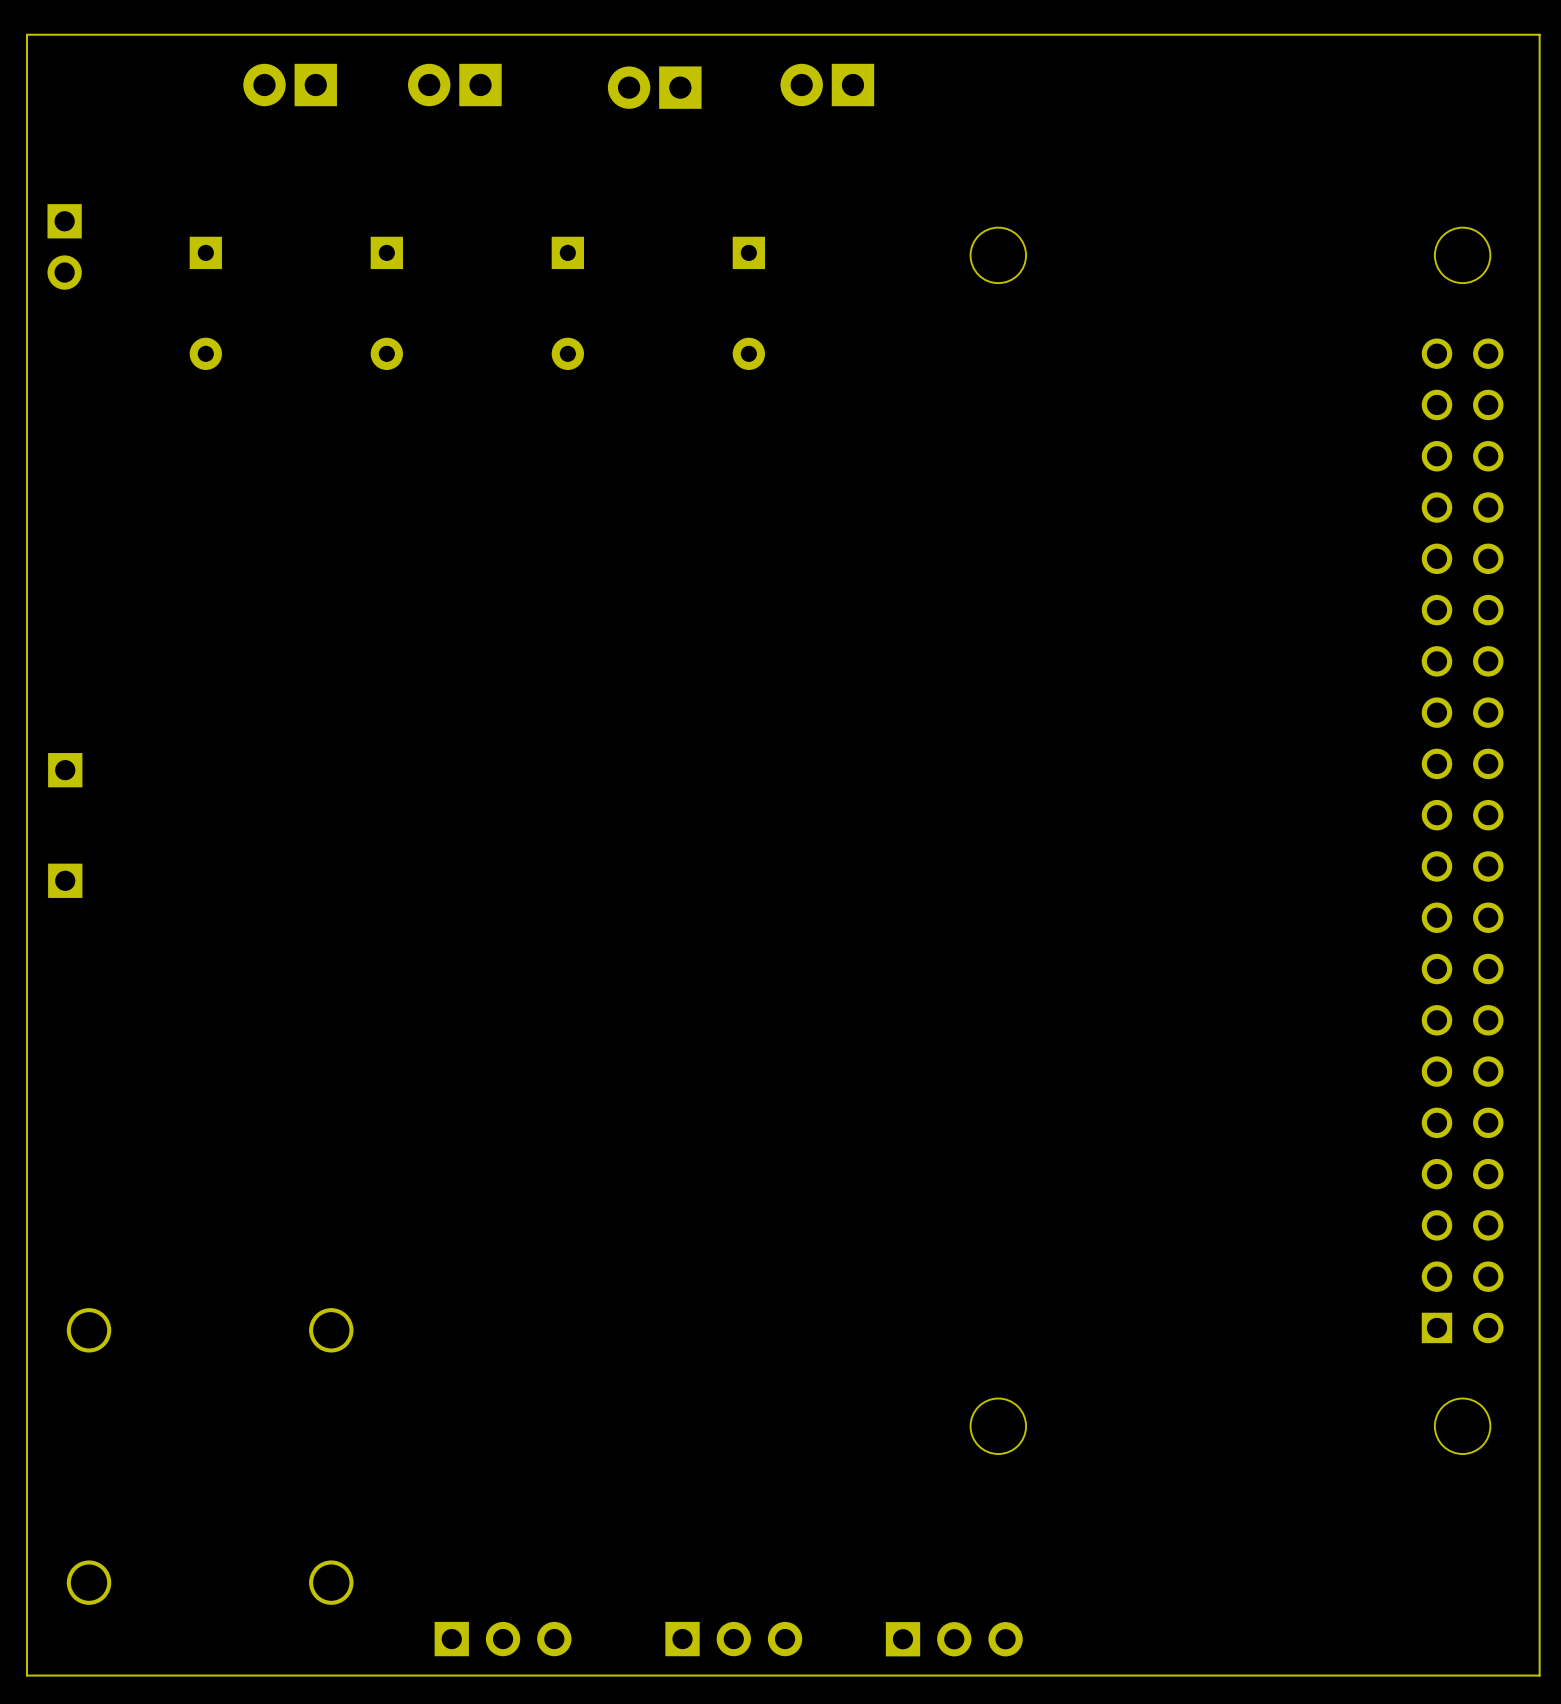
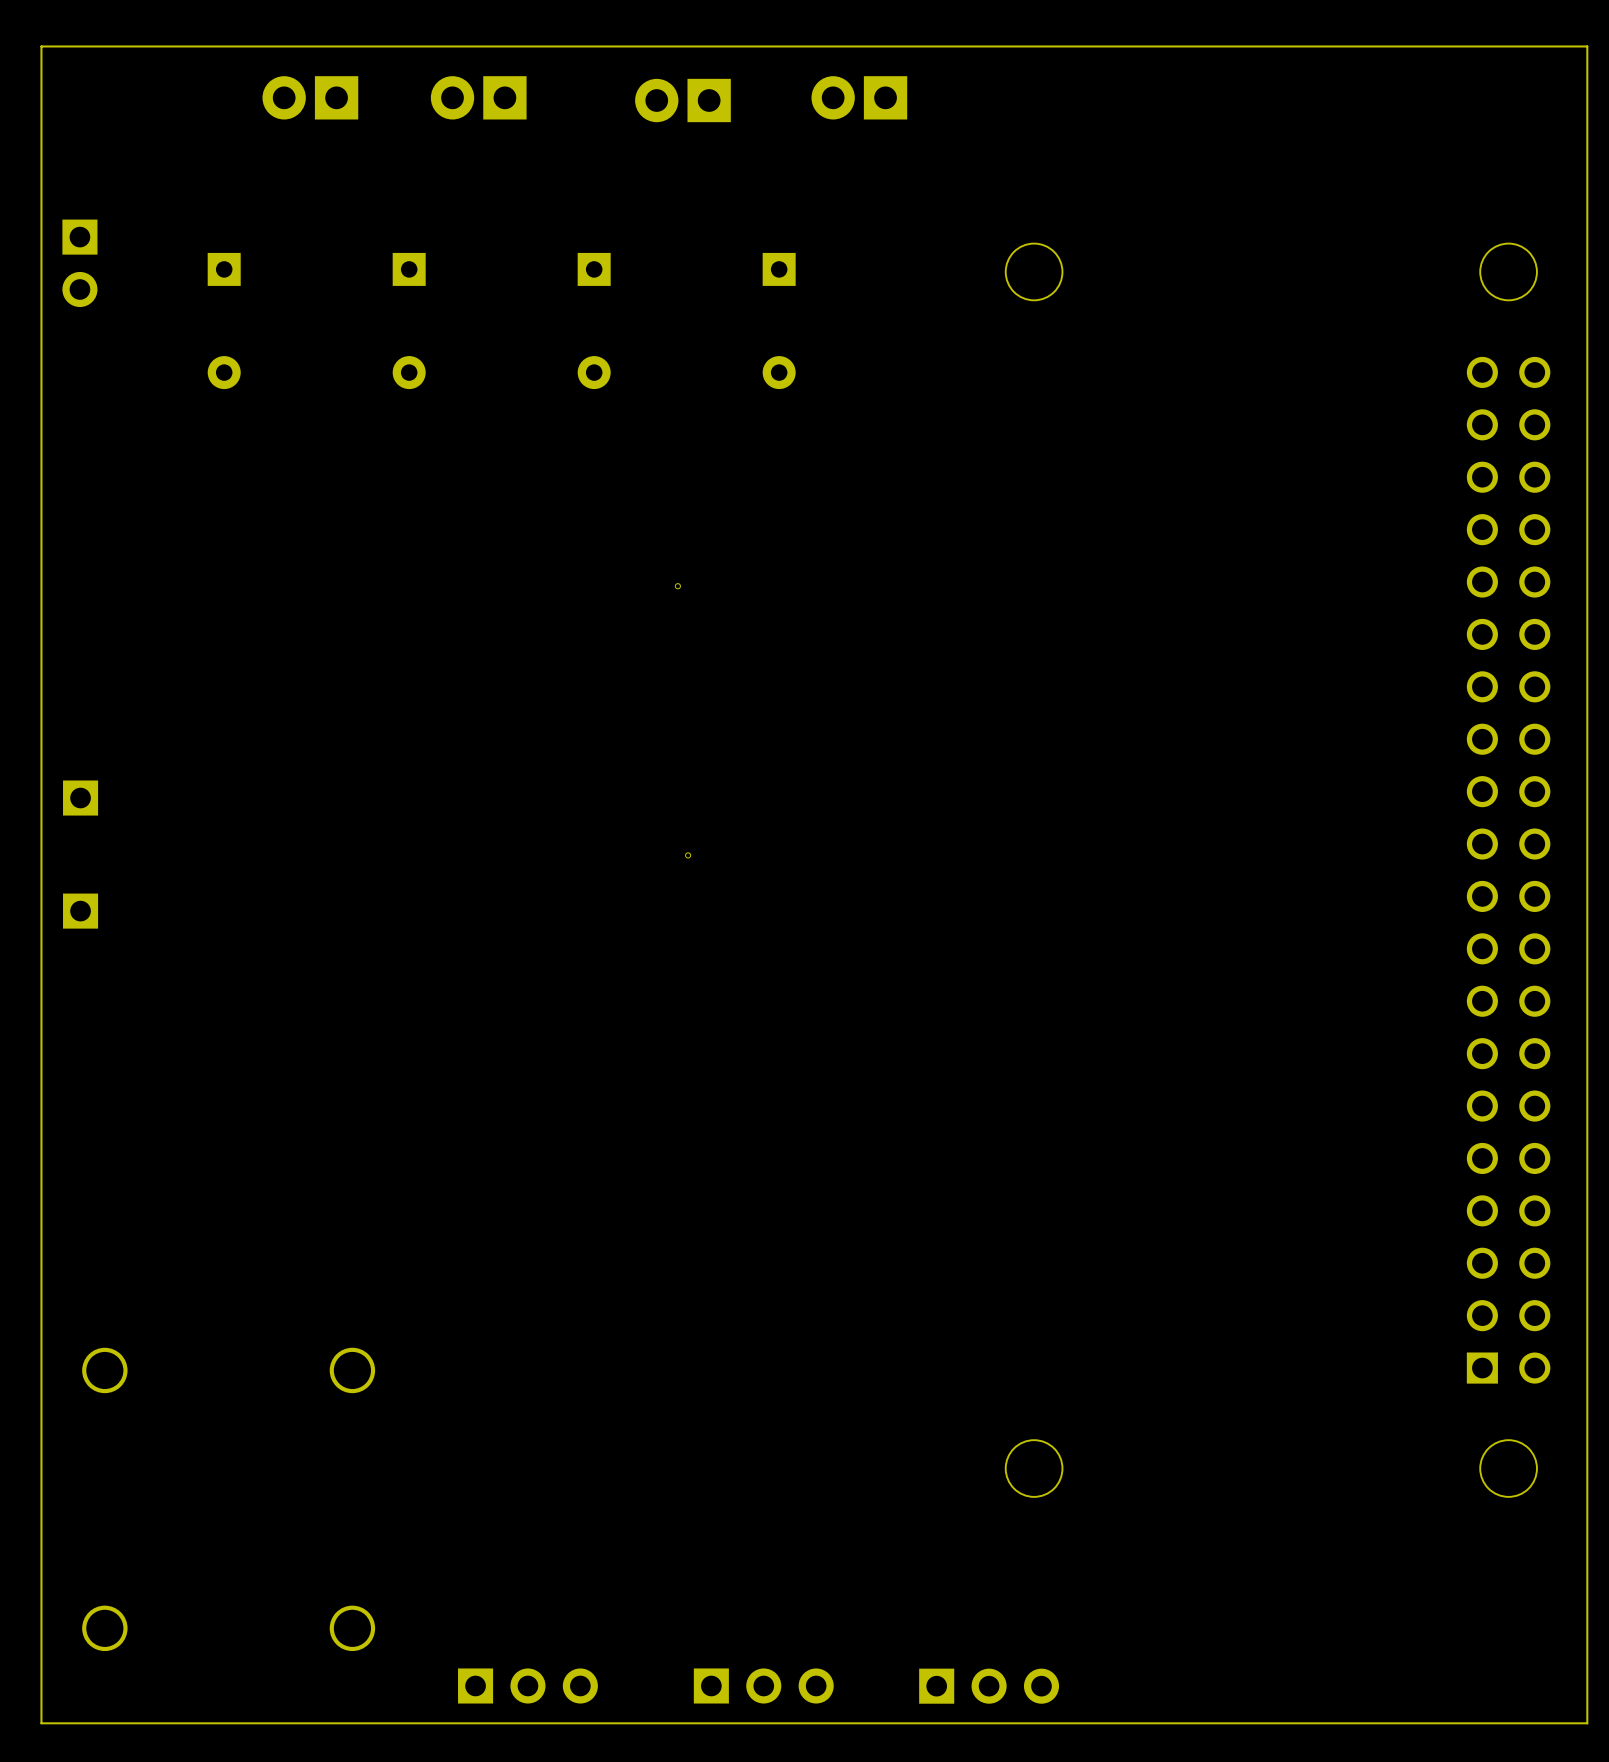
part: none -> (677, 586)
part: none -> (688, 855)

